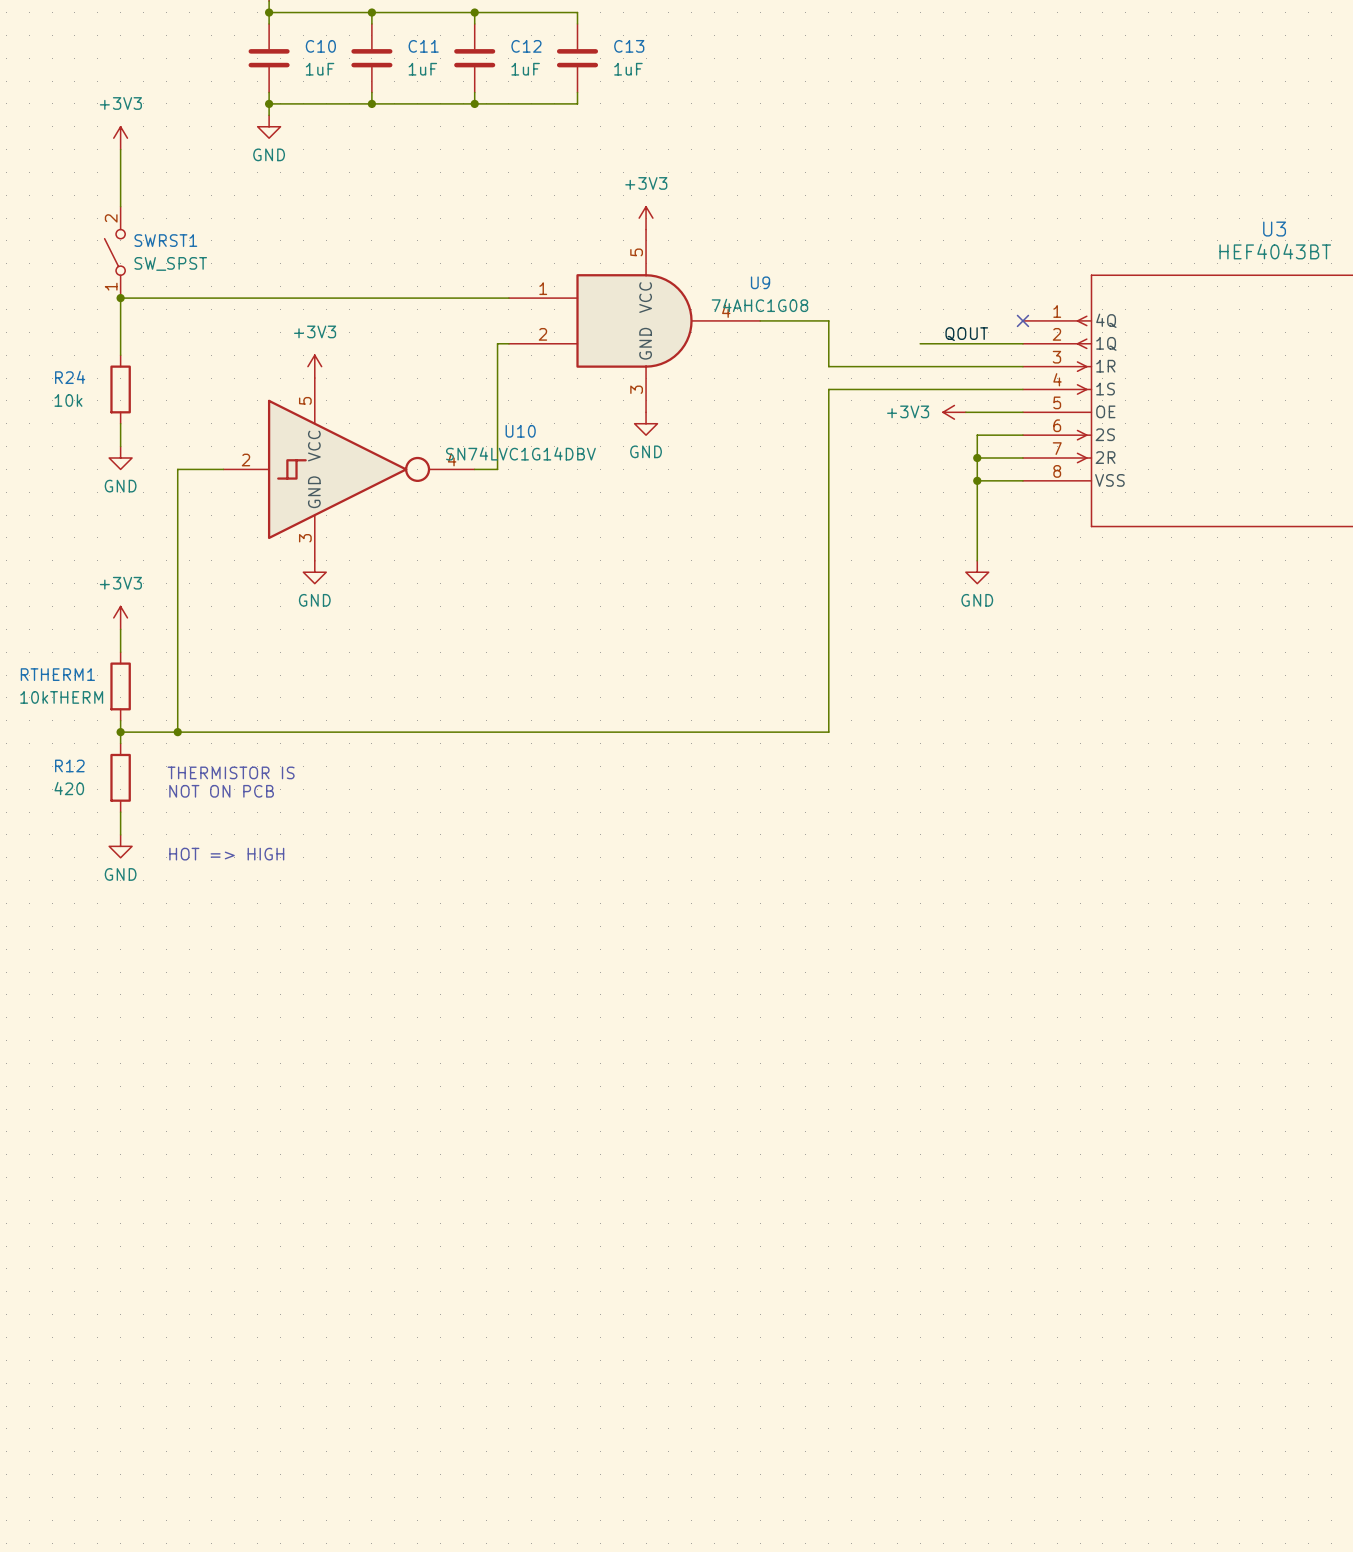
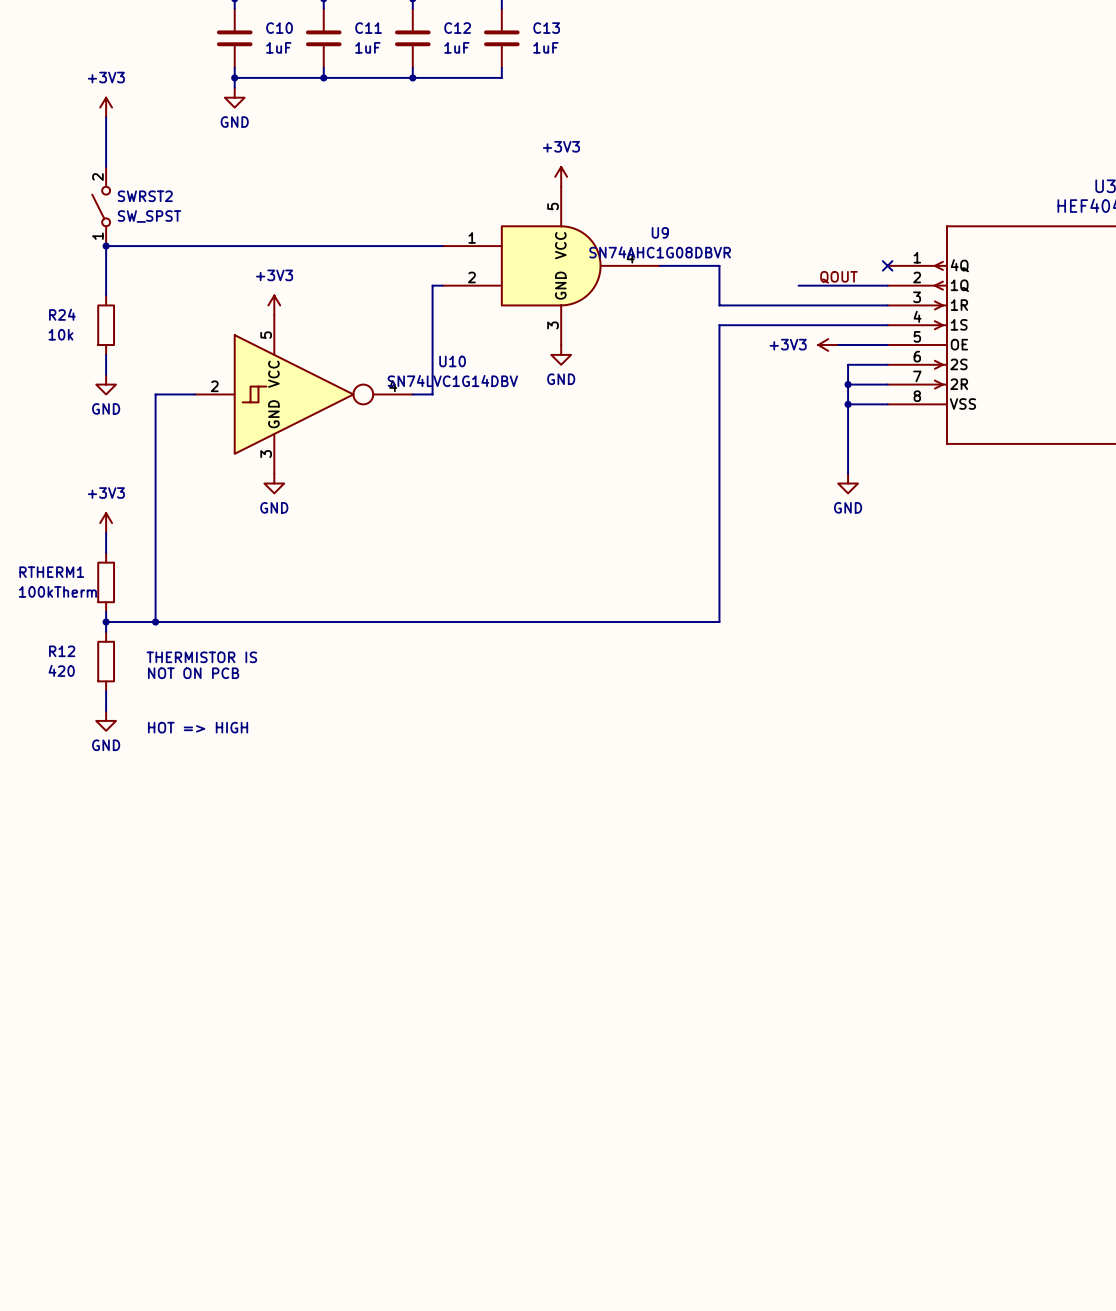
SWRST1 name: SWRST1 (165, 240) -> SWRST2 (145, 196)
U9 value: 74AHC1G08 (759, 305) -> SN74AHC1G08DBVR (660, 252)
RTHERM1 value: 10kTHERM (61, 697) -> 100kTherm (57, 591)

